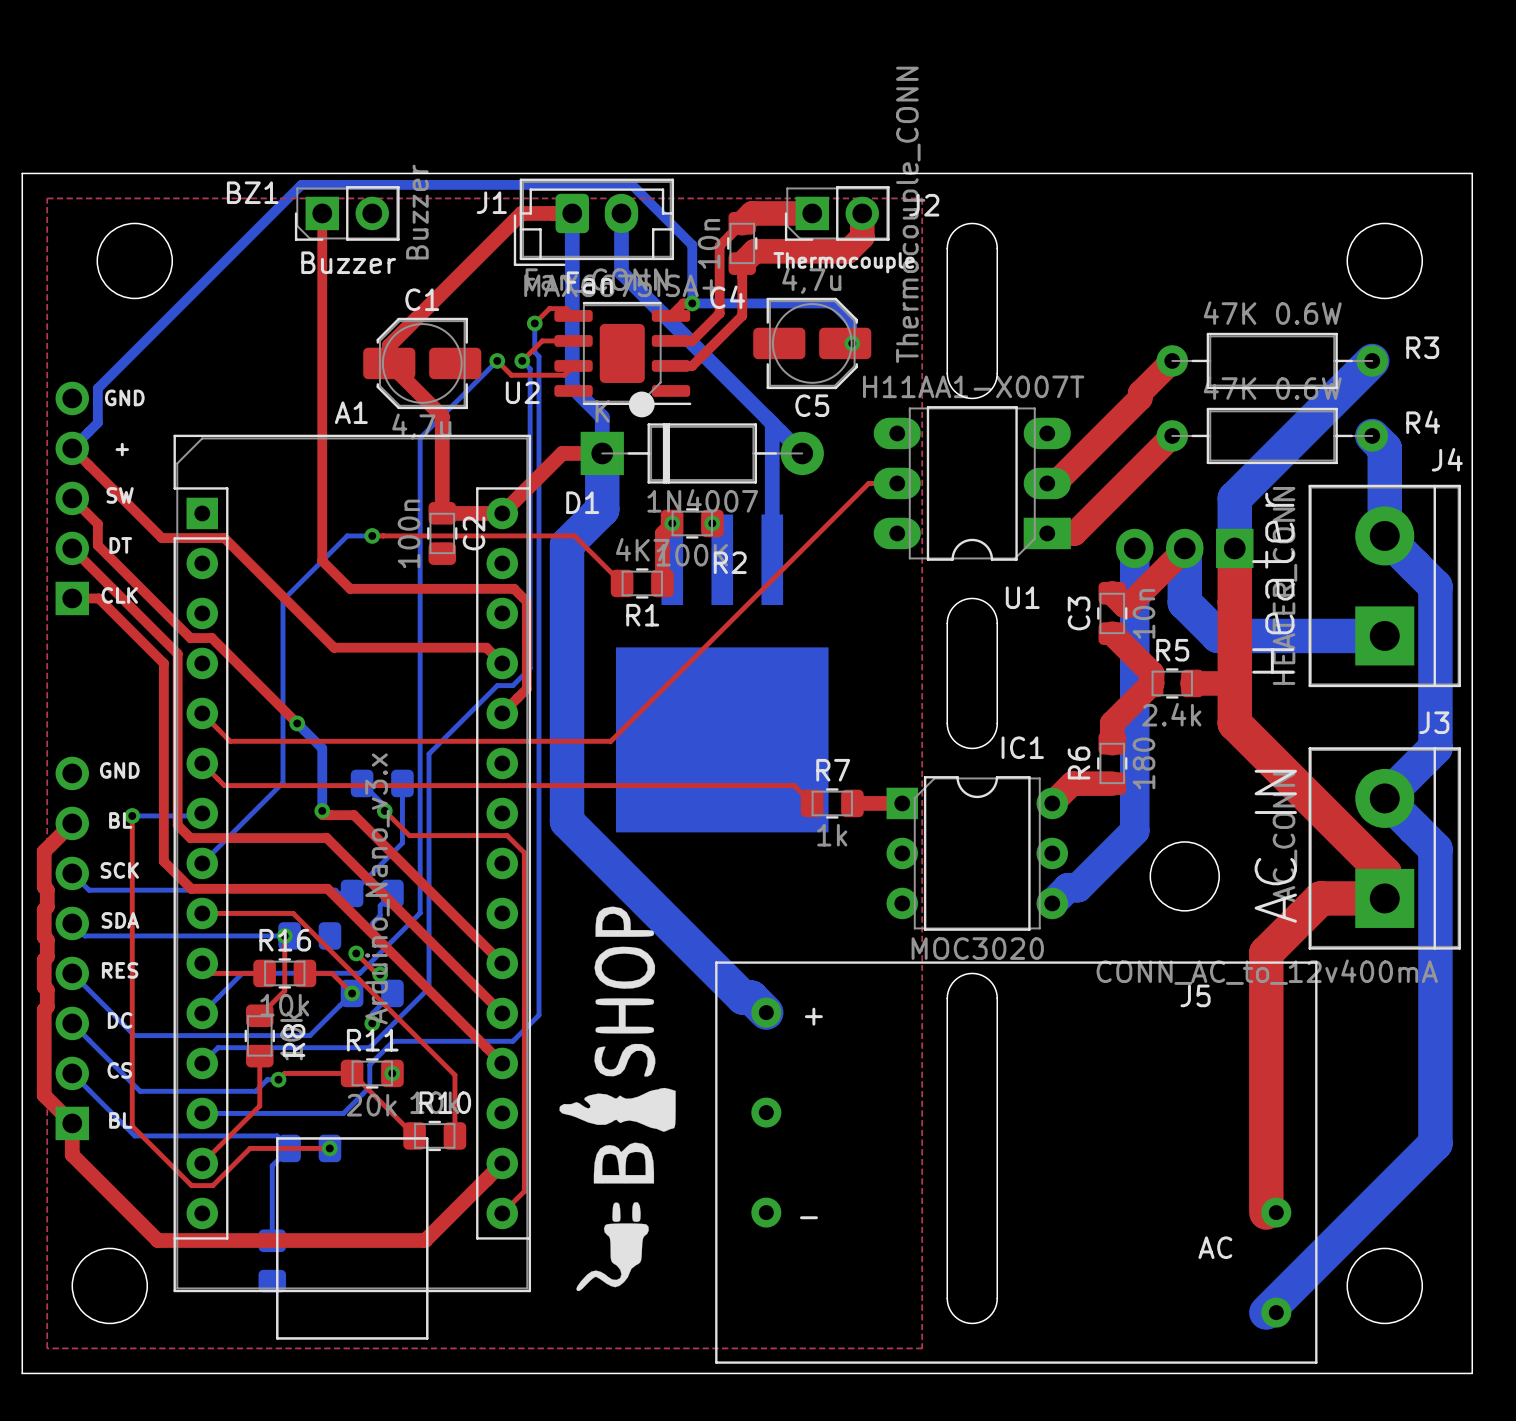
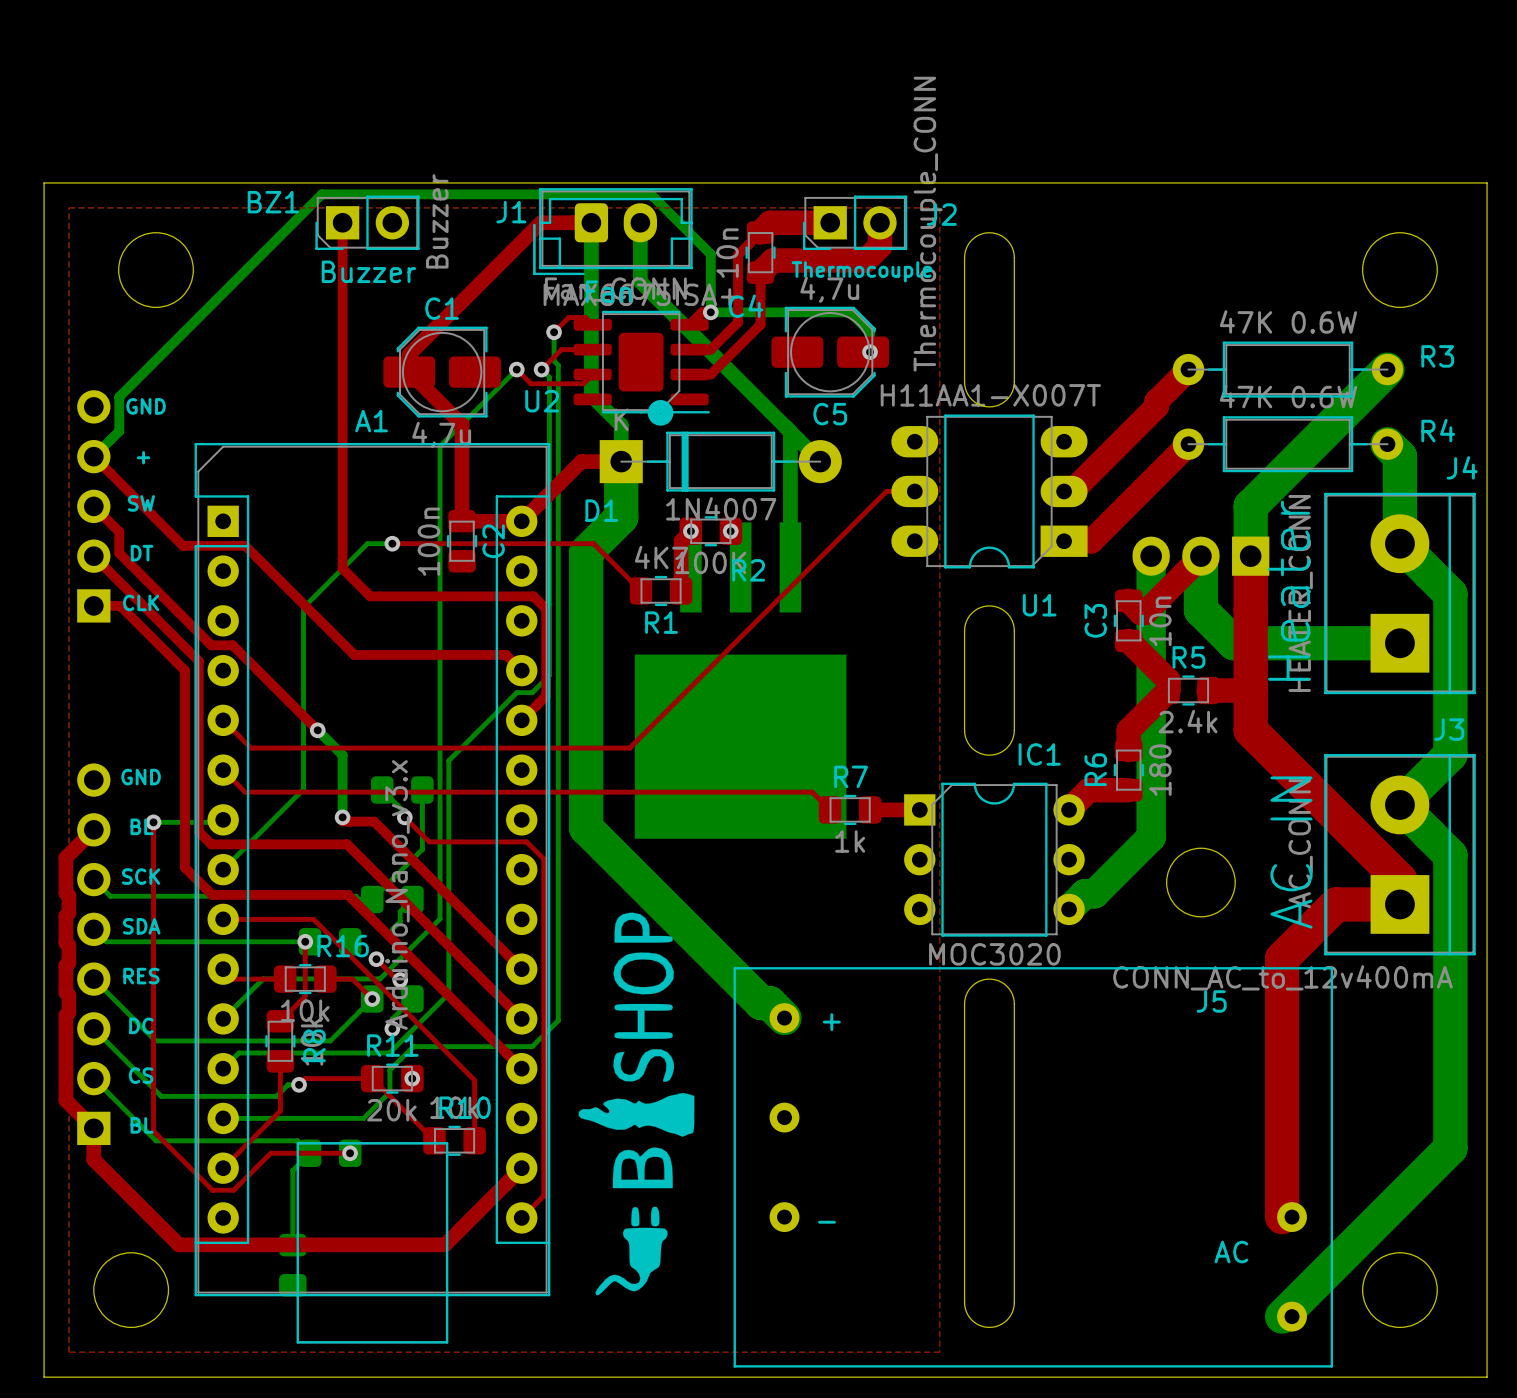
R16 name position: R16 (285, 940) -> R16 (343, 946)

